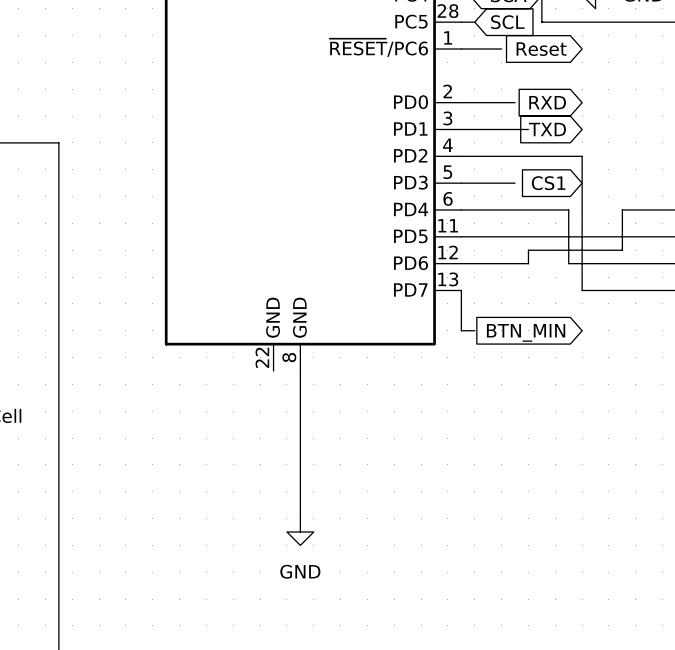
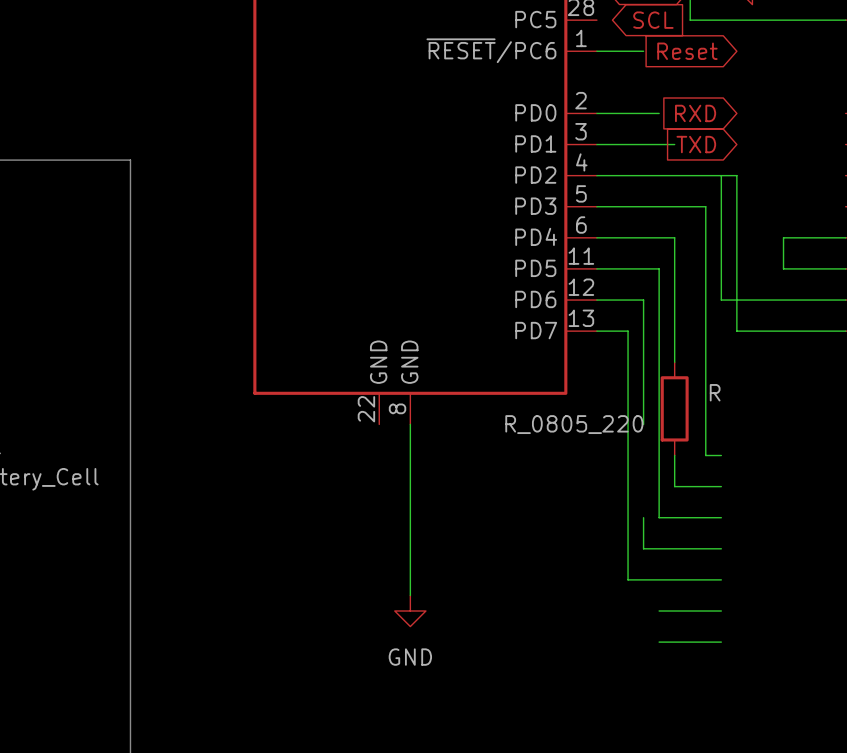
wire: (461, 22) (474, 22) -> none
wire: none -> (659, 206) (705, 206) (705, 455) (721, 455)
global label: CS1 (548, 183) -> none
wire: (528, 209) (568, 209) -> (721, 175) (721, 237)
wire: (515, 236) (622, 236) (622, 250) (528, 250) -> (674, 237) (674, 284)
wire: none -> (659, 268) (659, 517) (721, 517)
wire: (501, 263) (528, 263) -> (674, 362) (674, 300)
wire: none -> (643, 300) (643, 424)
wire: (461, 290) (461, 330) (474, 330) -> (596, 331) (628, 331) (628, 579) (721, 579)
global label: BTN_MIN (526, 332) -> none
R: none -> R_0805_220 (674, 408)
wire: none -> (674, 455) (674, 486) (721, 486)
wire: none -> (643, 517) (643, 548) (721, 548)
wire: none -> (659, 611) (721, 611)
wire: none -> (659, 642) (721, 642)

